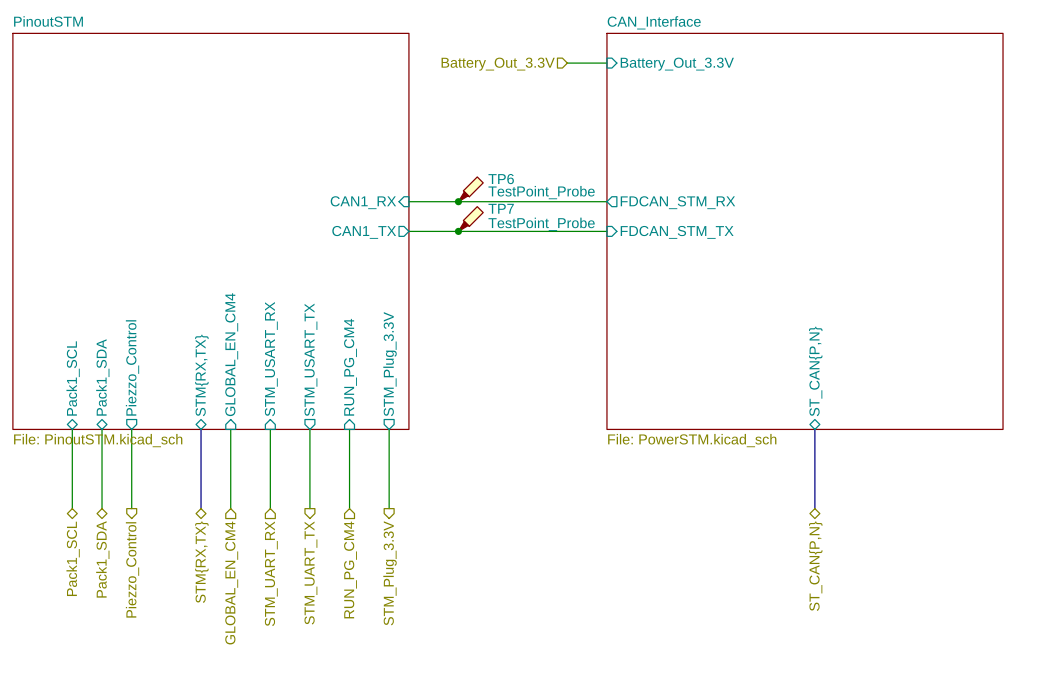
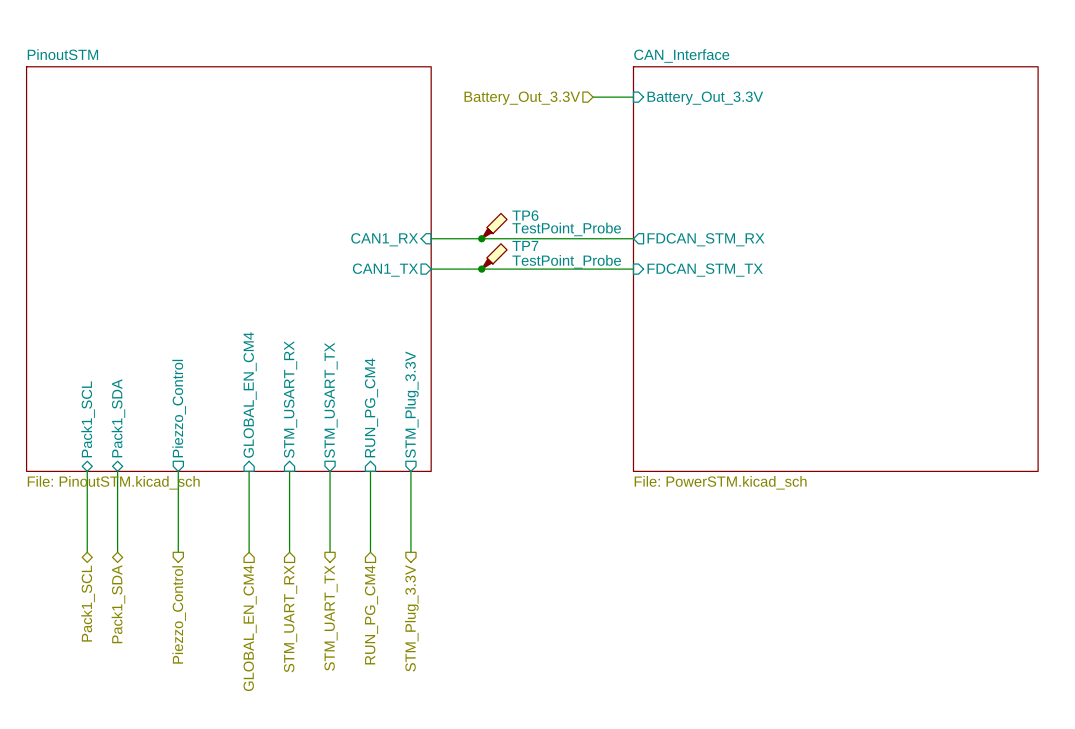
sheet pin position: Piezzo_Control (132, 367) -> Piezzo_Control (179, 408)
sheet pin: ST_CAN{P,N} (815, 371) -> none
sheet pin: STM{RX,TX} (201, 375) -> none
wire: (131, 429) (131, 508) -> (178, 471) (178, 552)
bus: (201, 429) (201, 508) -> none
bus: (814, 429) (814, 508) -> none
hierarchical label: STM{RX,TX} (201, 562) -> none
hierarchical label: ST_CAN{P,N} (815, 566) -> none
hierarchical label position: Piezzo_Control (132, 569) -> Piezzo_Control (179, 614)

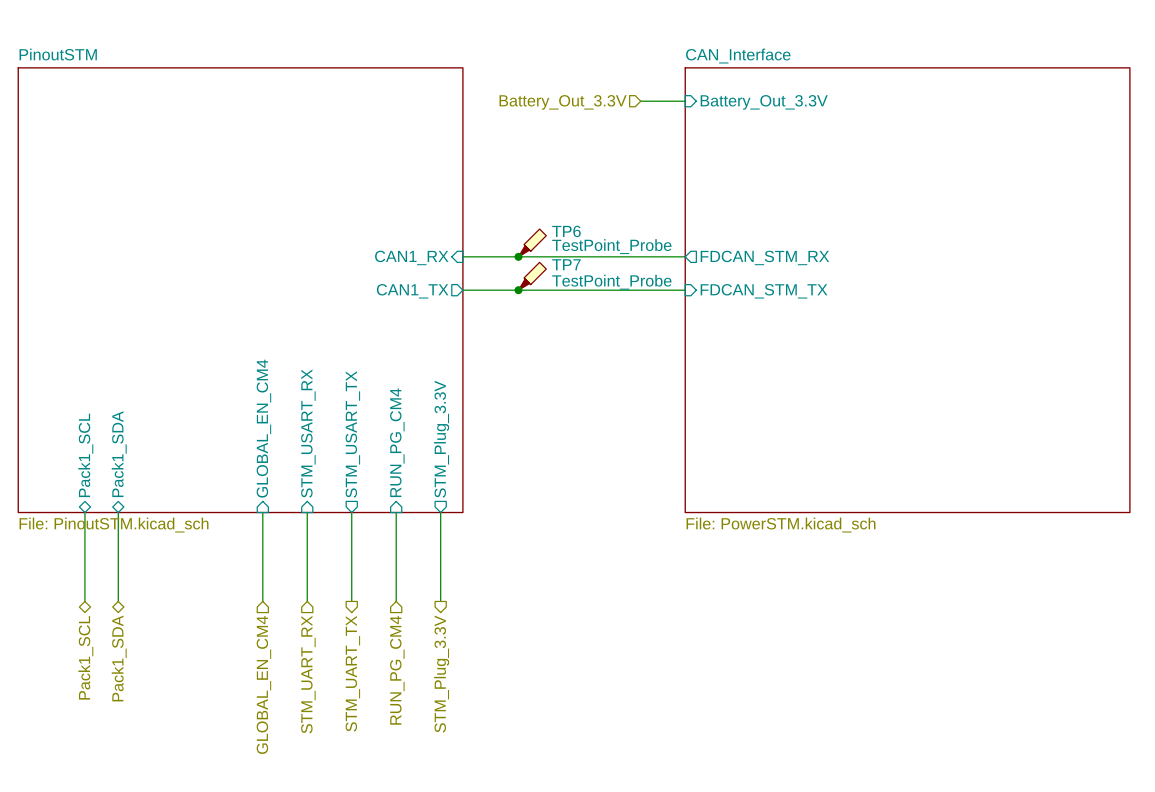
sheet pin: Piezzo_Control (179, 408) -> none
wire: (178, 471) (178, 552) -> none
hierarchical label: Piezzo_Control (179, 614) -> none

